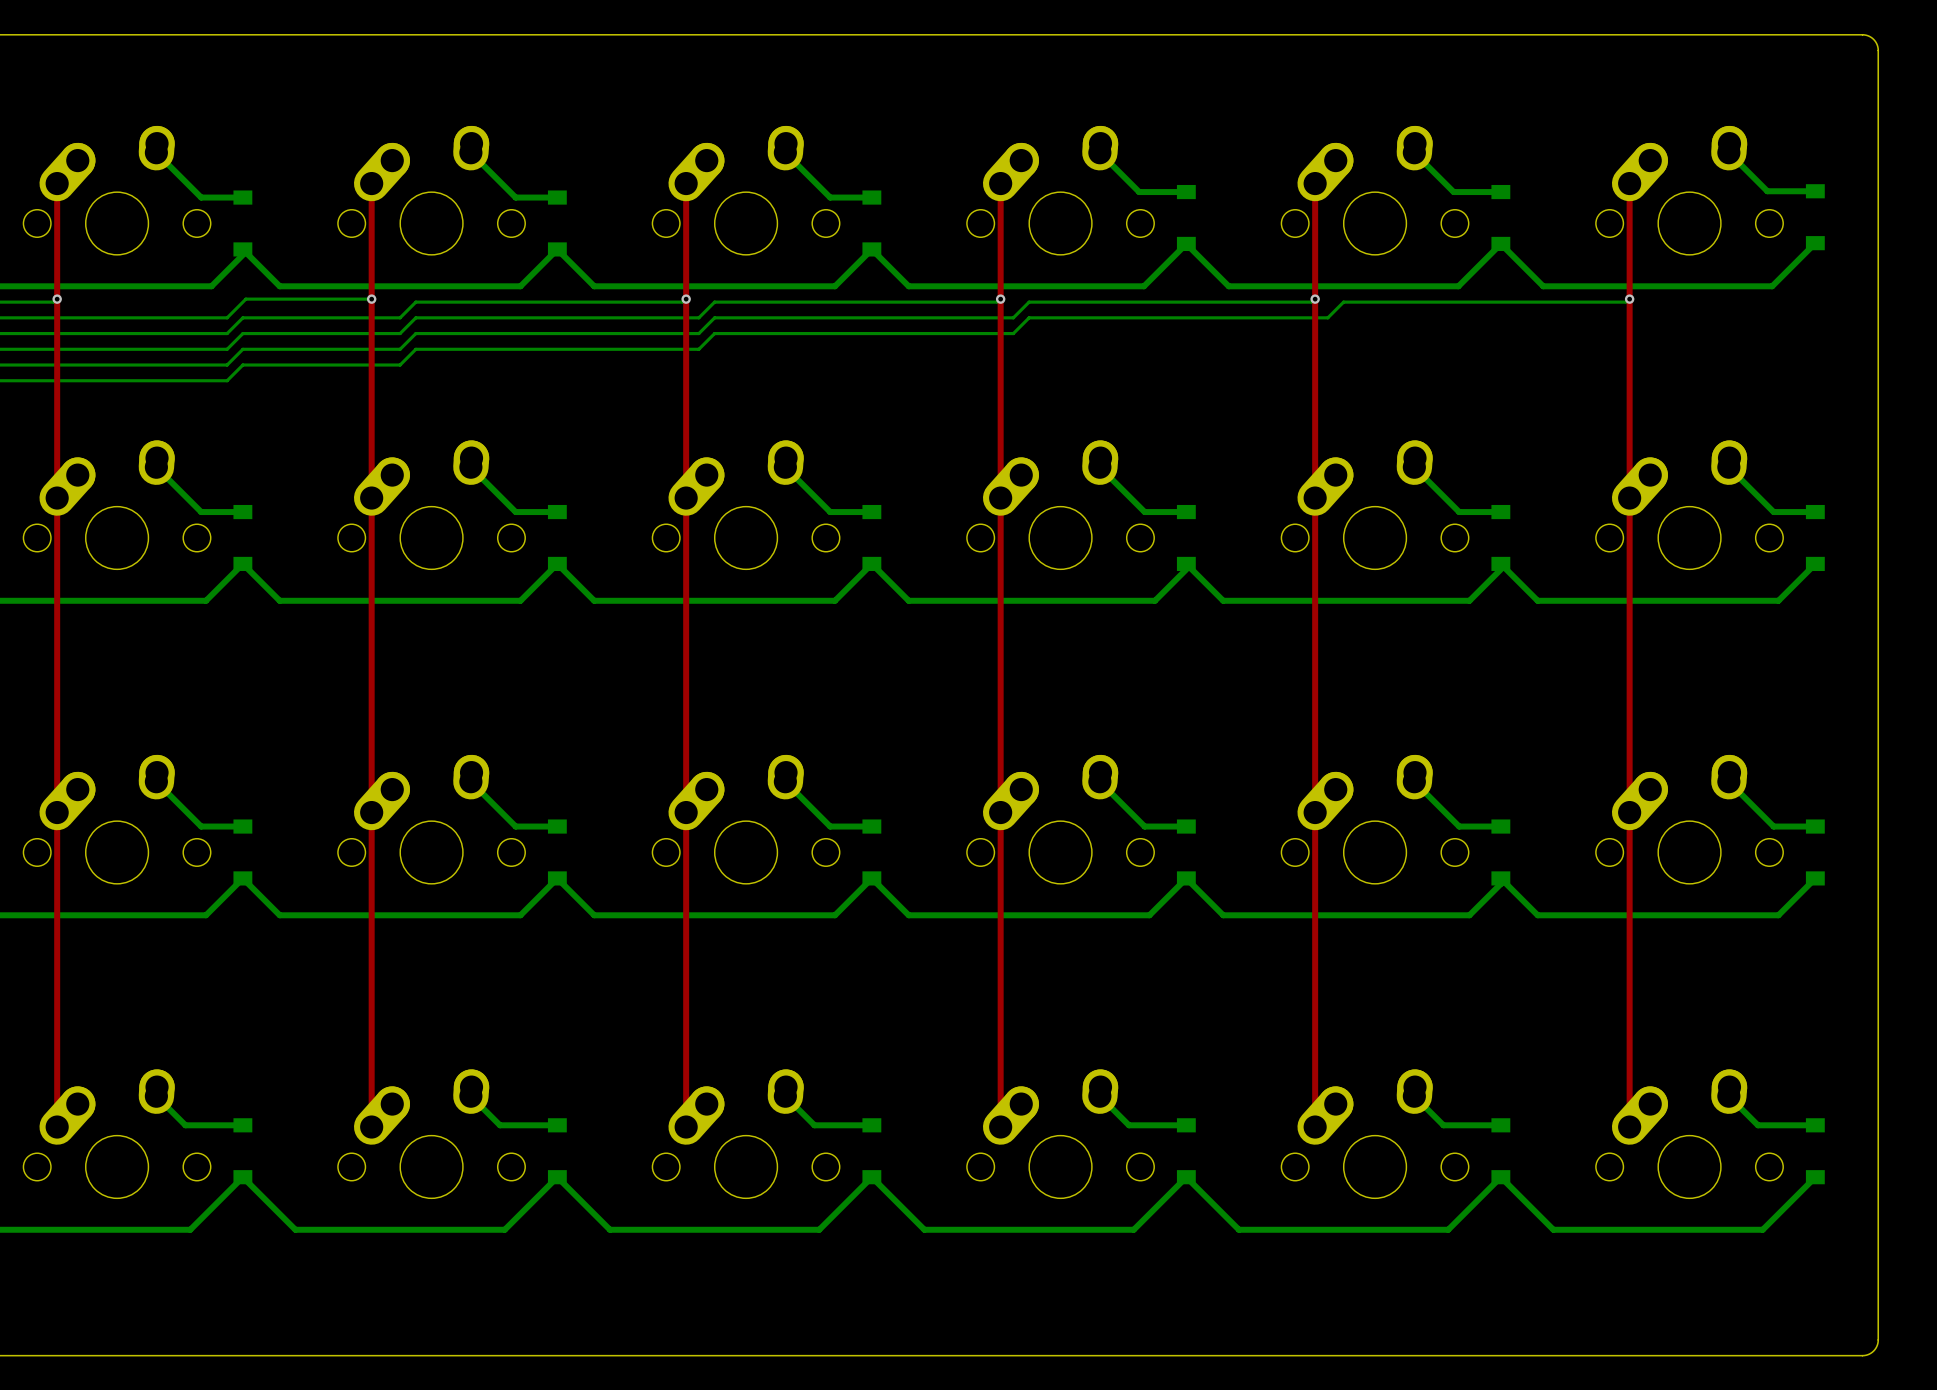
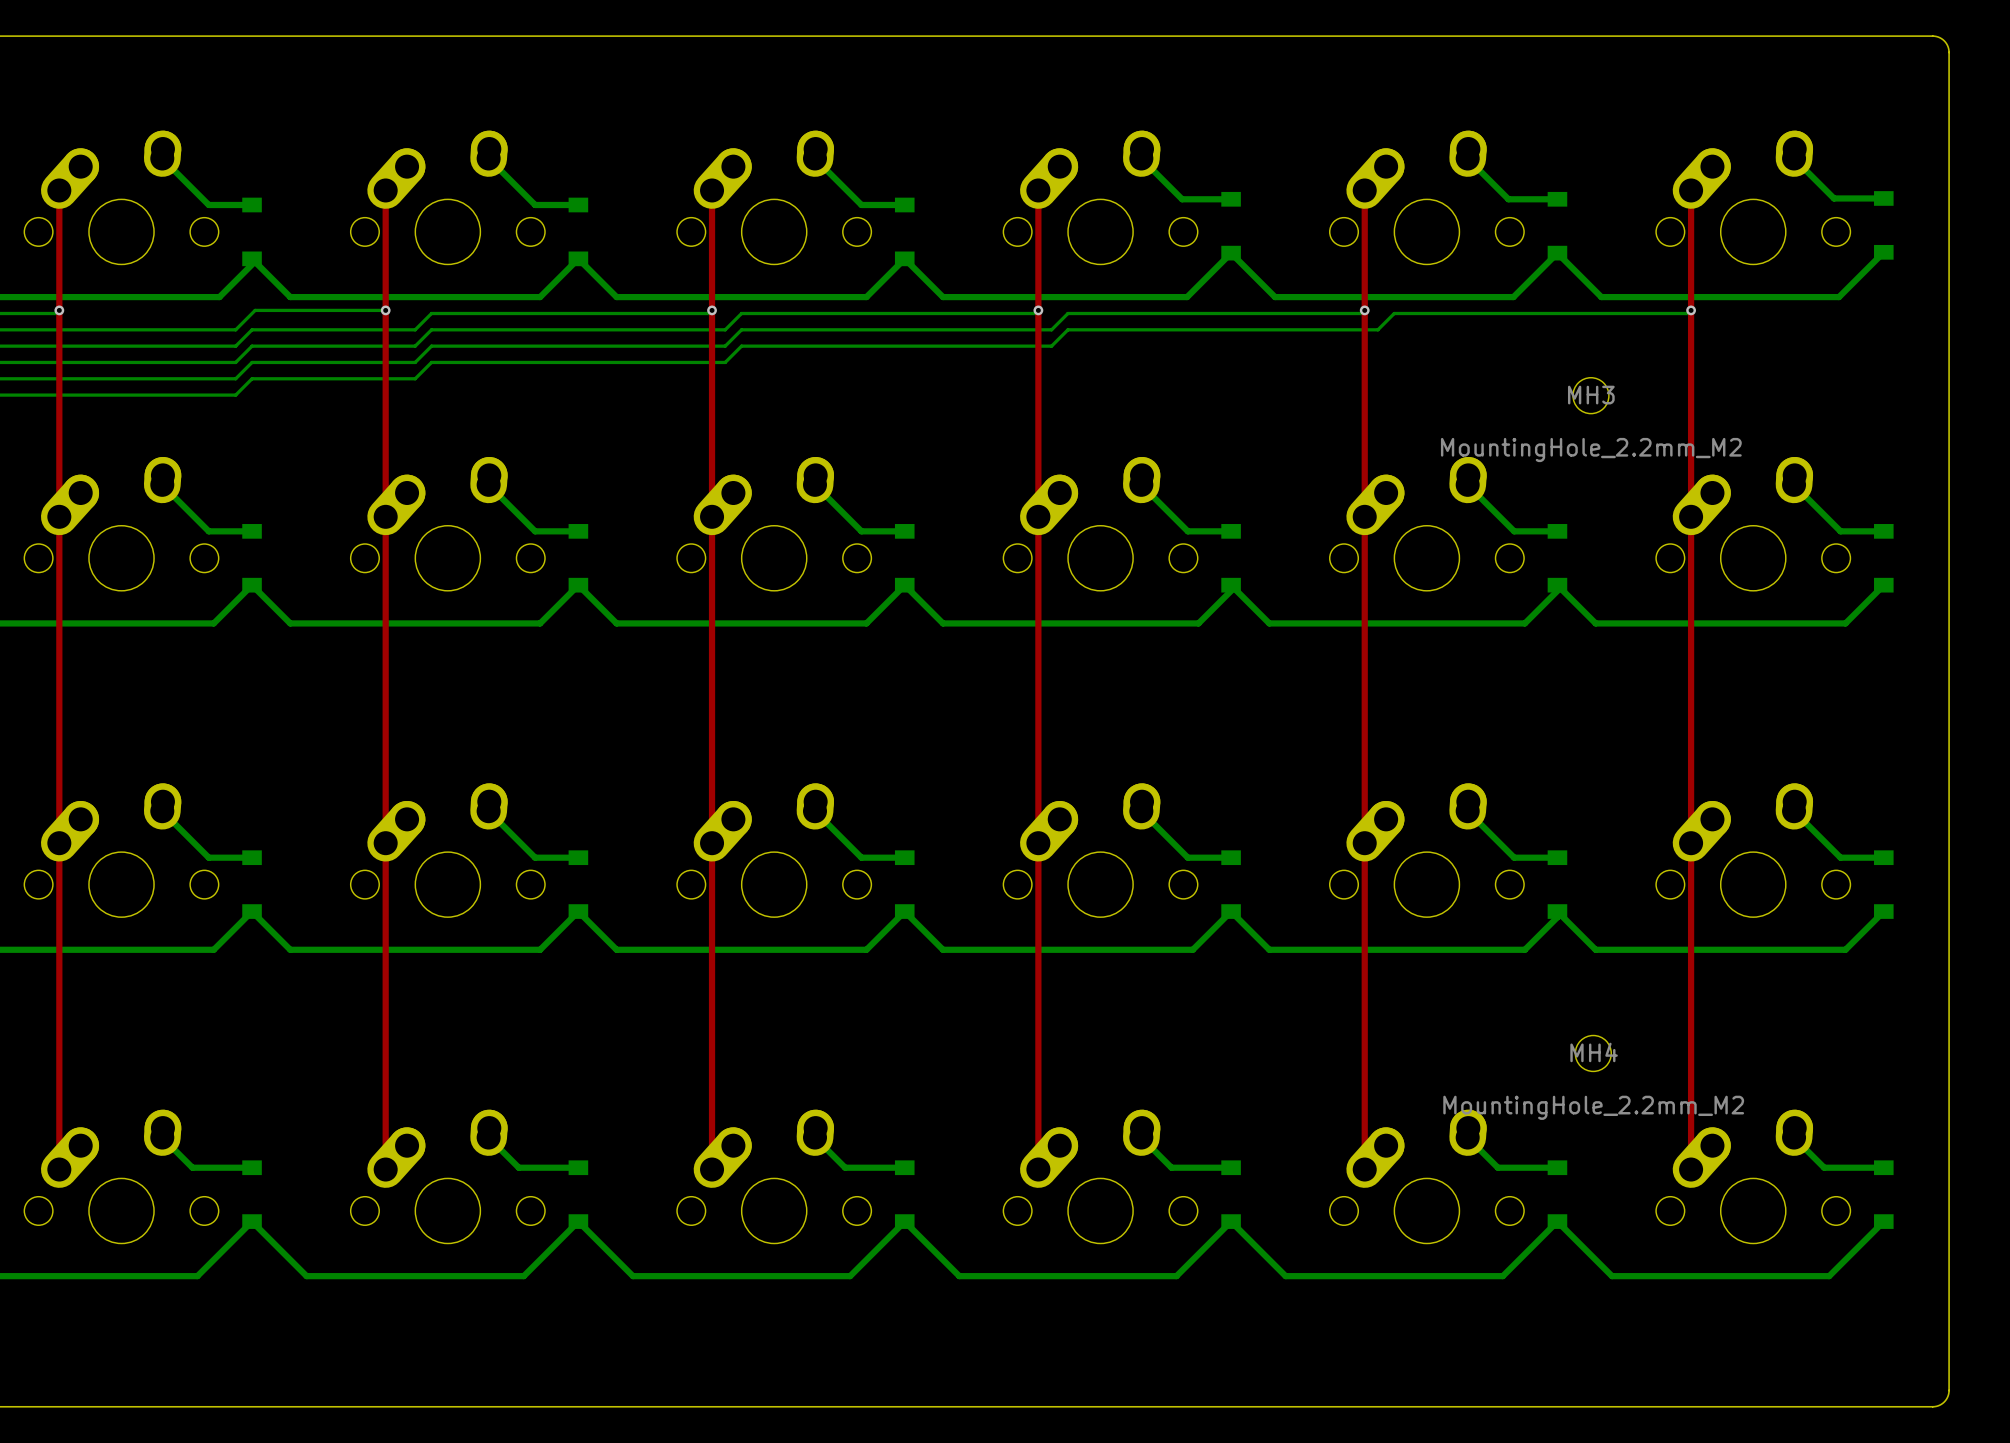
MH3: none -> MountingHole_2.2mm_M2 (1590, 395)
MH4: none -> MountingHole_2.2mm_M2 (1593, 1053)

